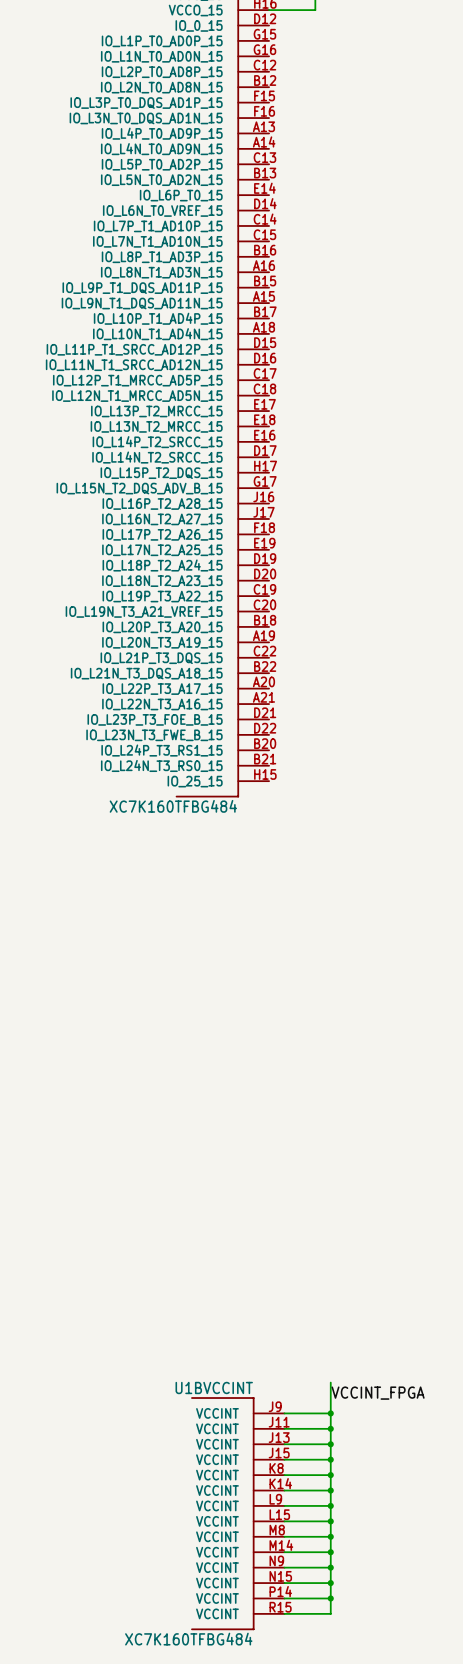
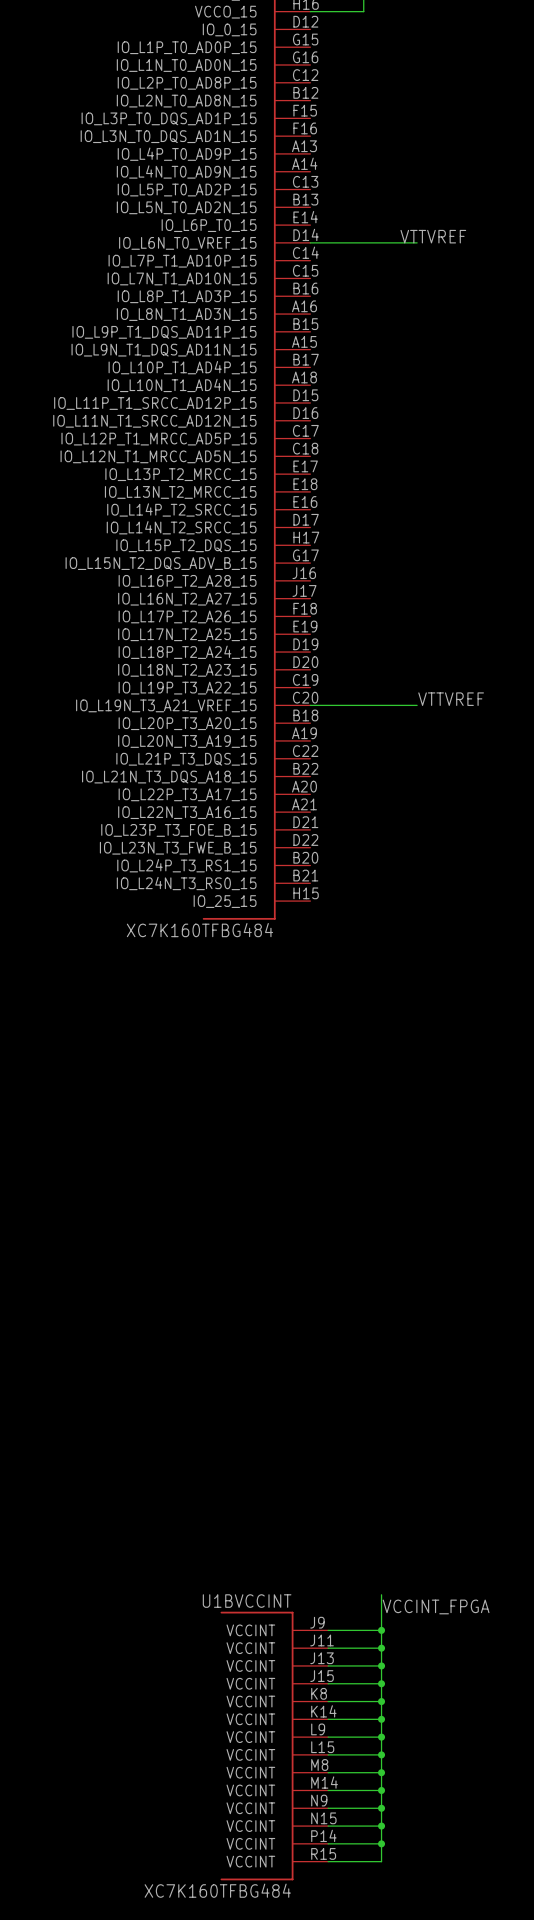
label: none -> VTTVREF (433, 236)
wire: none -> (310, 242) (417, 242)
label: none -> VTTVREF (451, 699)
wire: none -> (310, 705) (417, 705)

